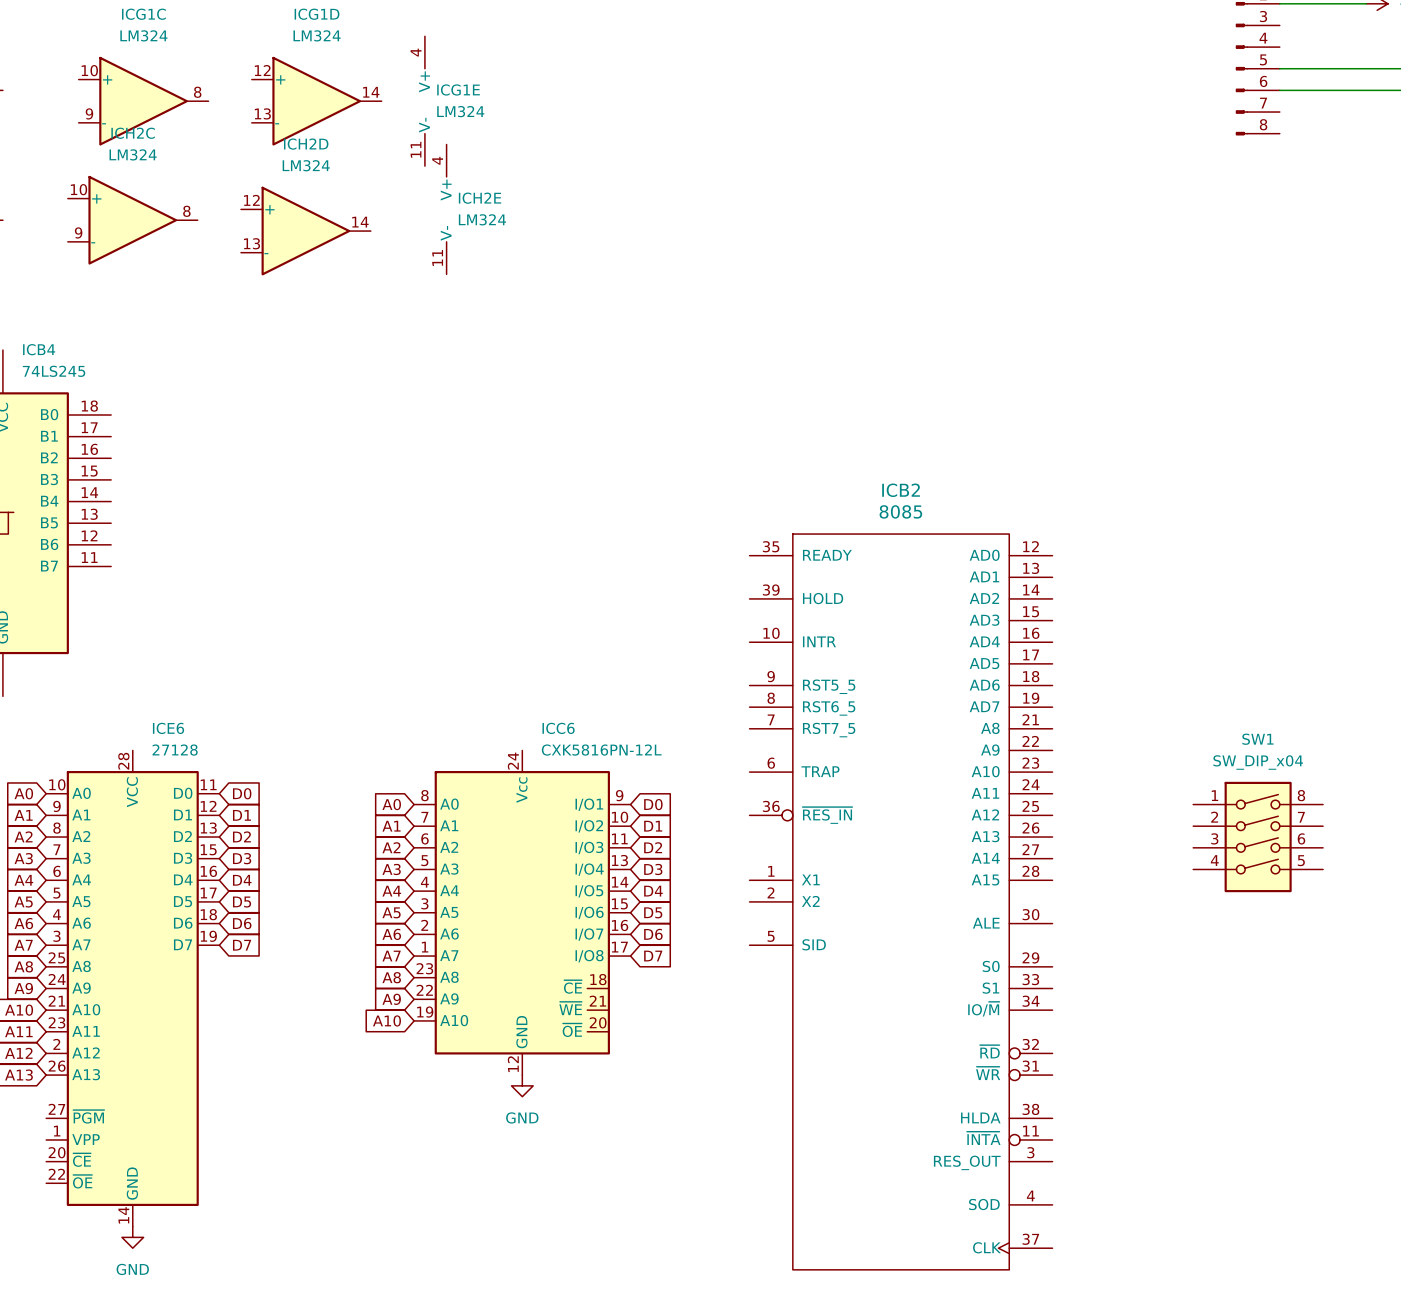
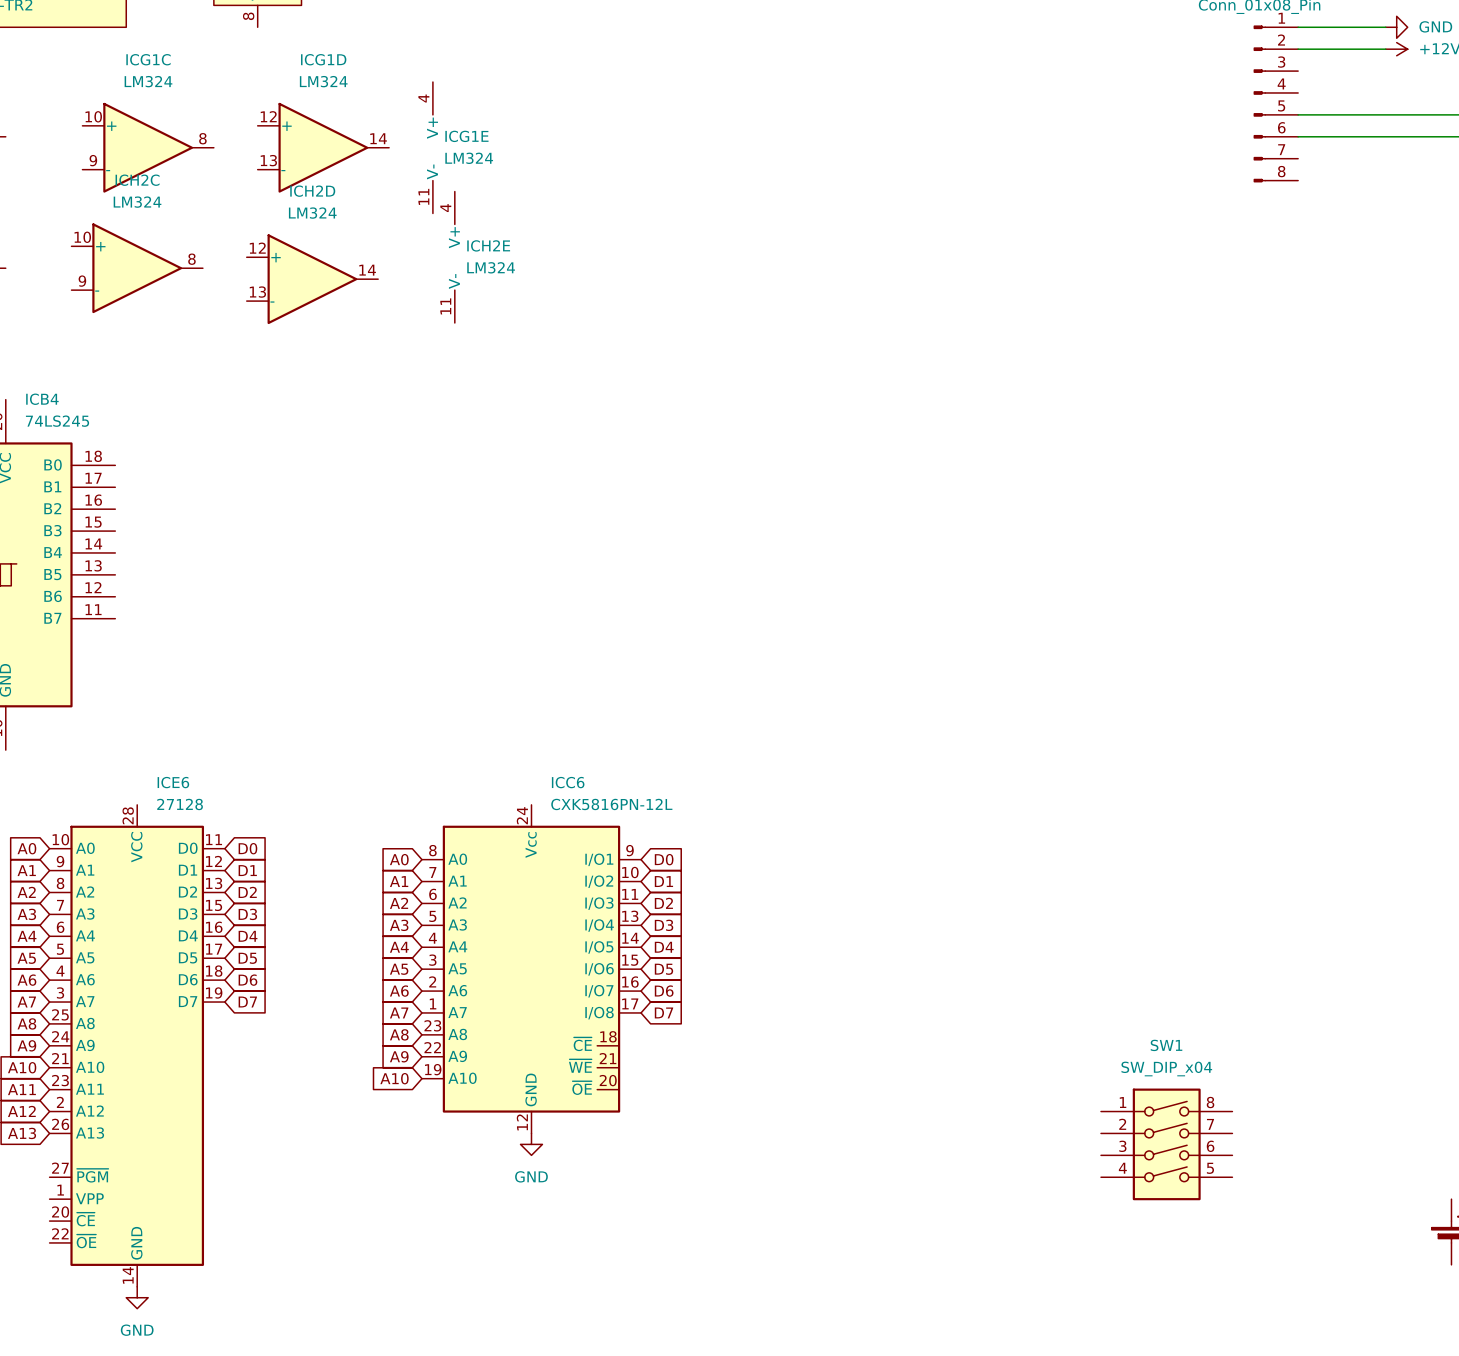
SW1 position: (1258, 837) -> (1166, 1144)
ICB2: 8085 (901, 901) -> none

